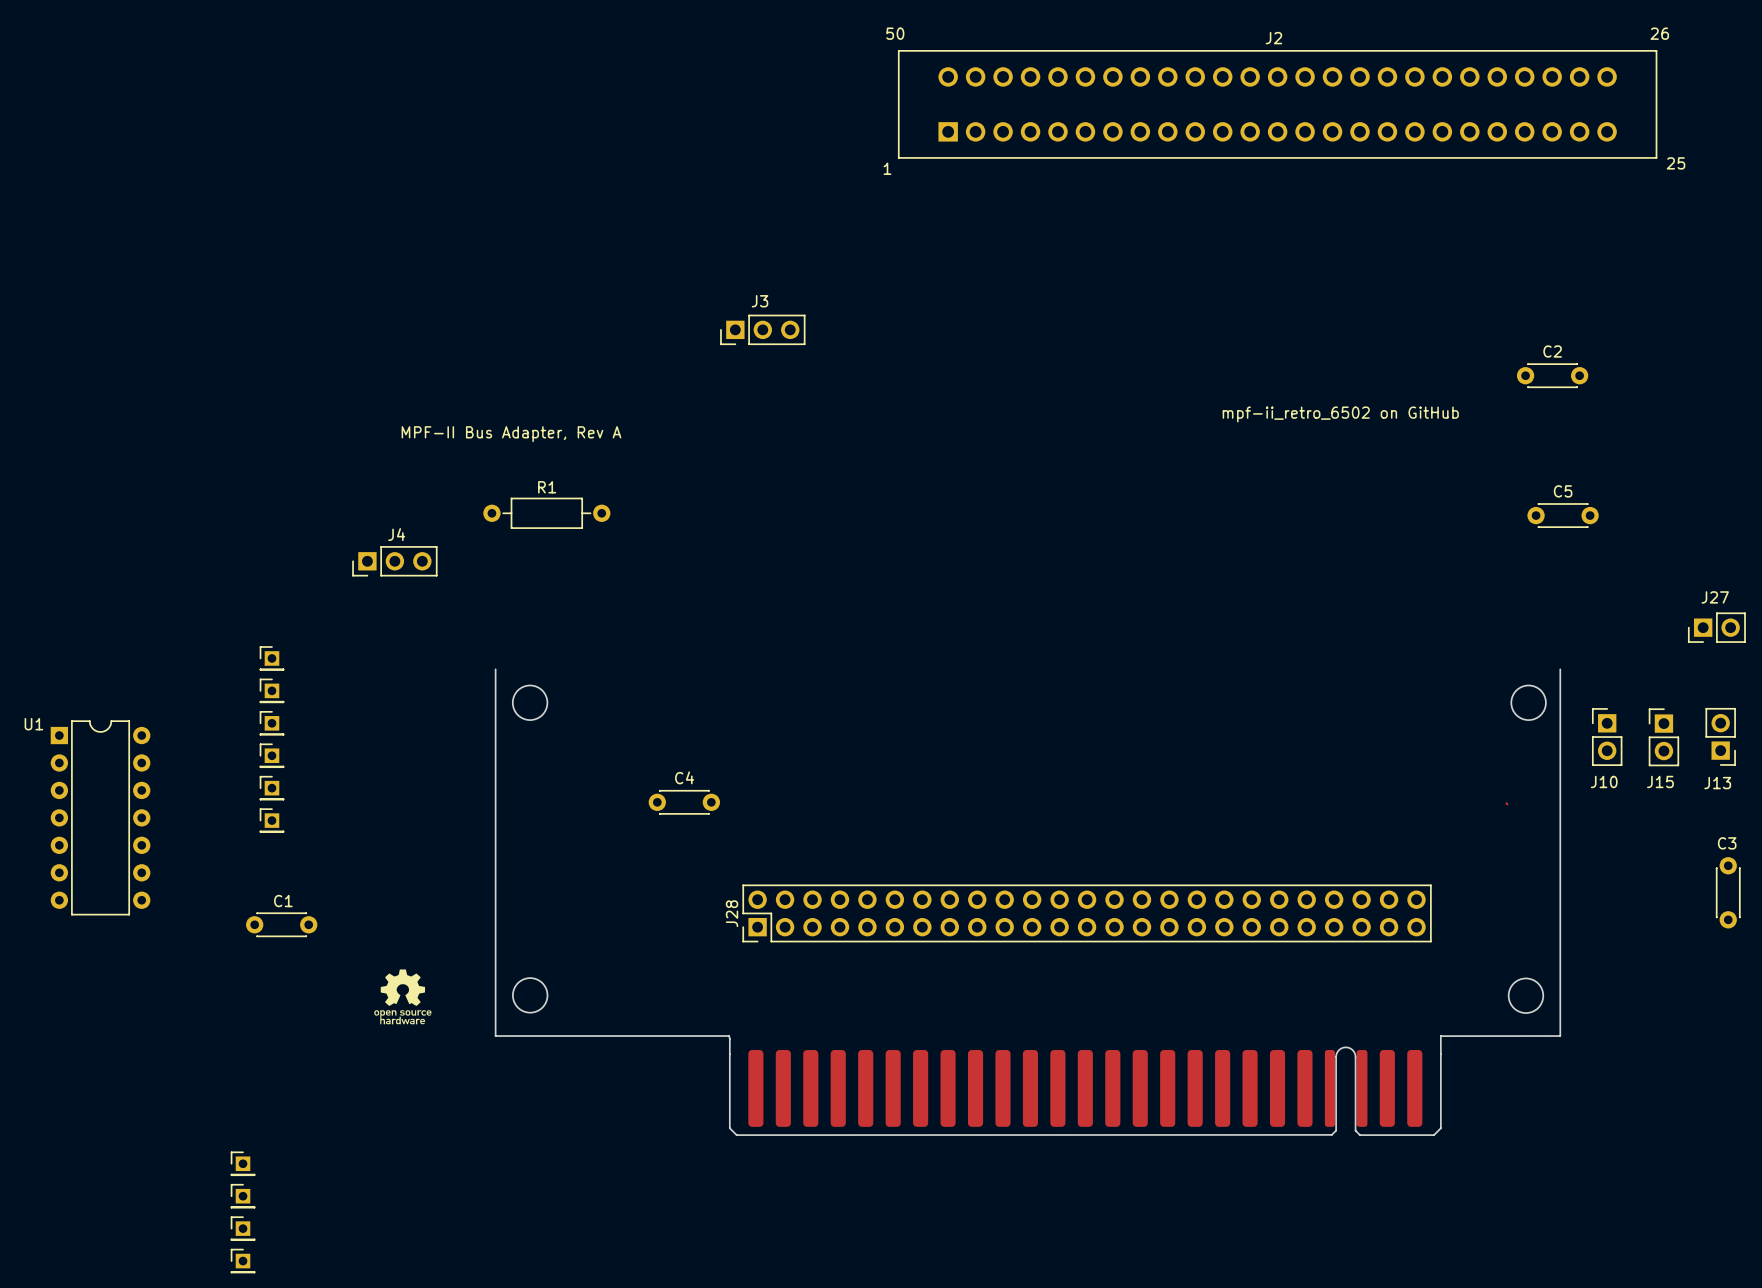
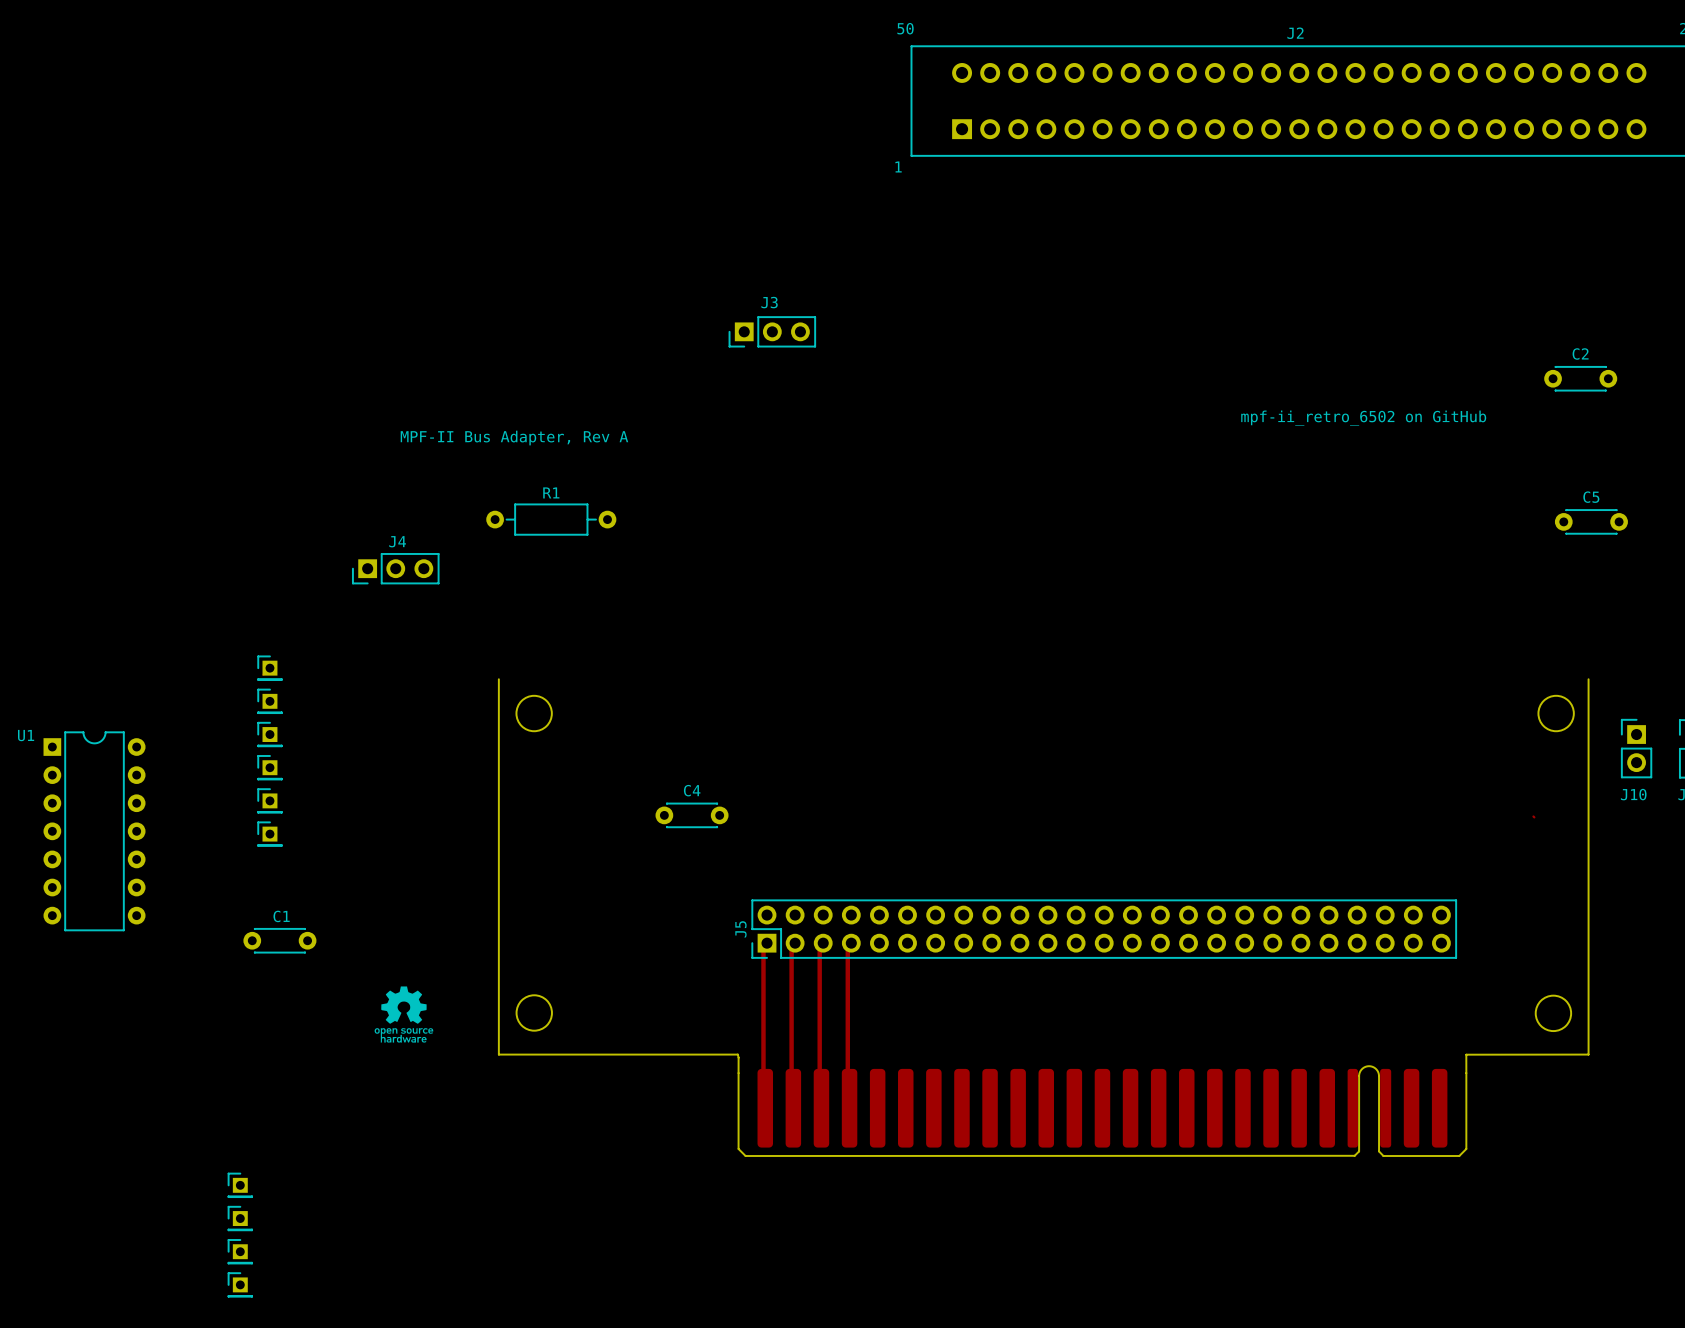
J28 name: J28 (732, 913) -> J5 (740, 929)
track: none -> (763, 951) (763, 1106) (765, 1108)
track: none -> (791, 951) (791, 1106) (793, 1108)
track: none -> (819, 951) (819, 1106) (821, 1108)
track: none -> (847, 951) (847, 1106) (849, 1108)

